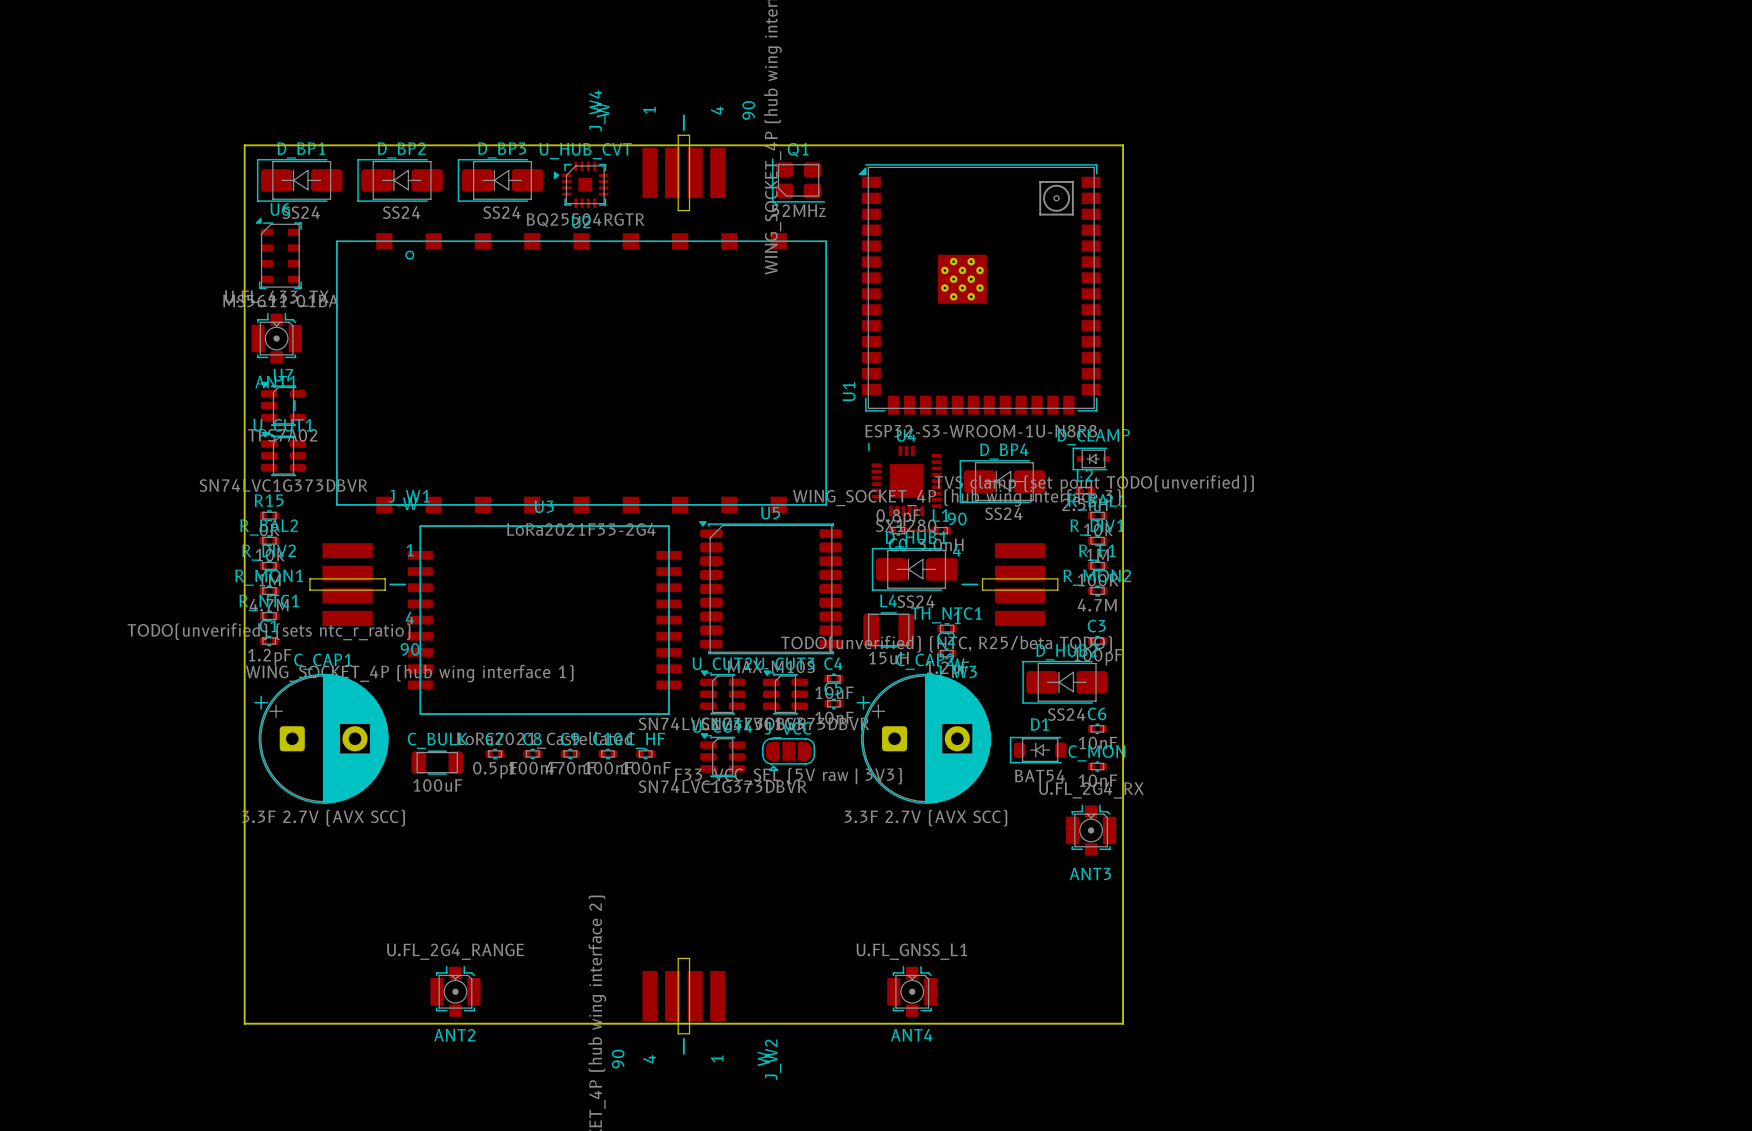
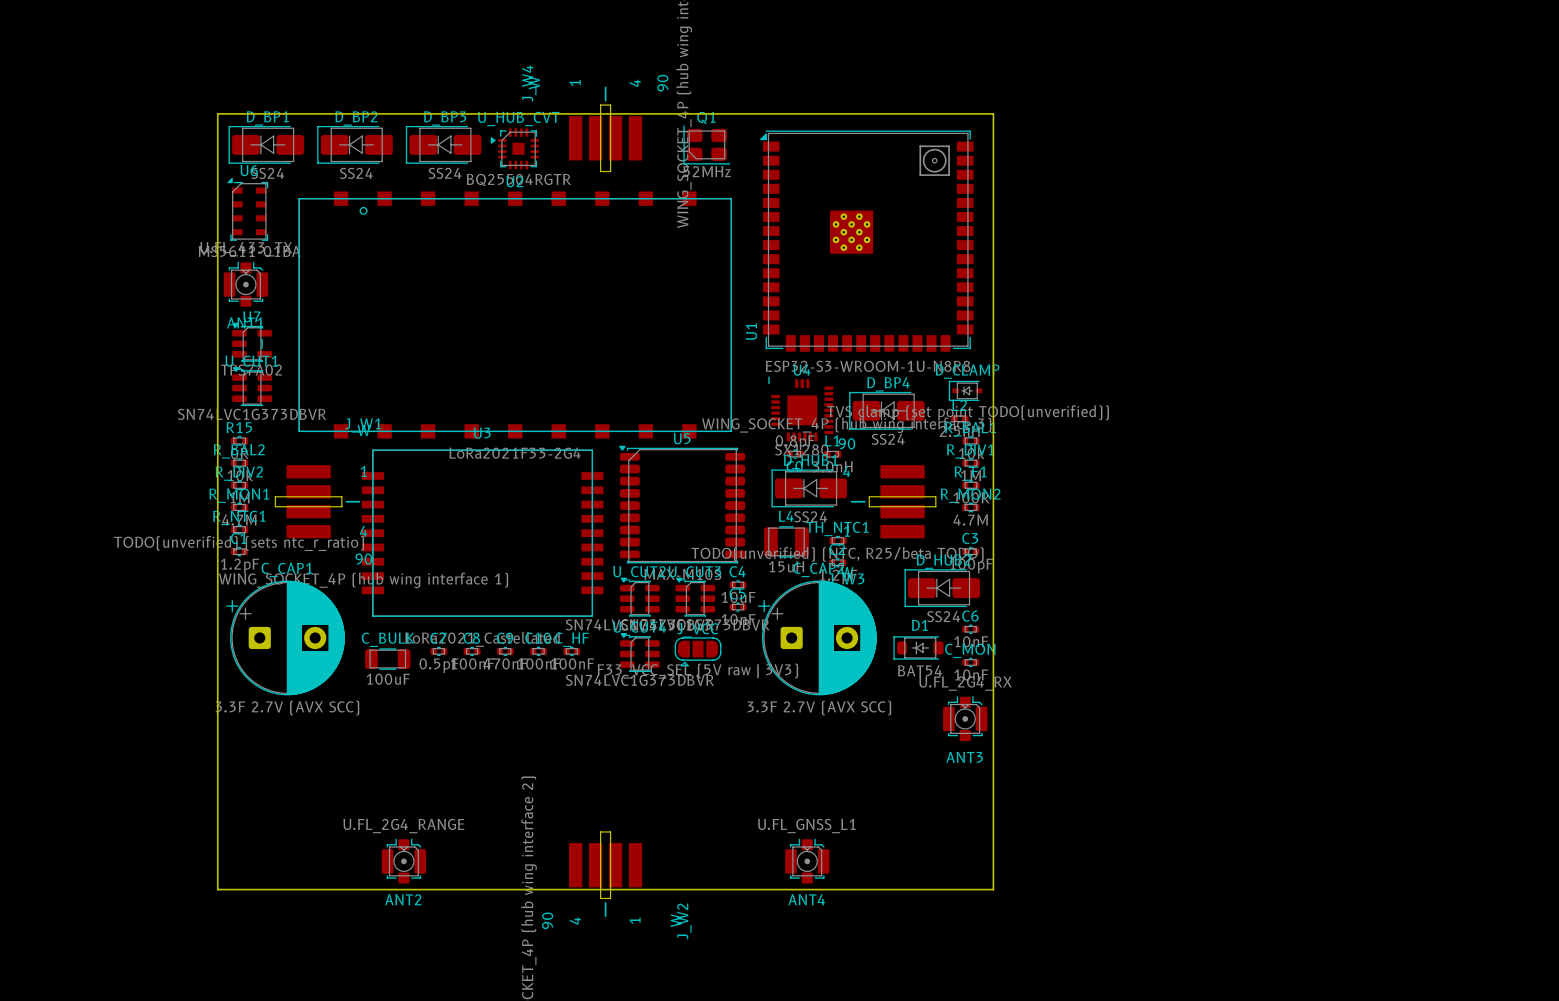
track: (903, 511) (904, 530) (935, 530) -> none

